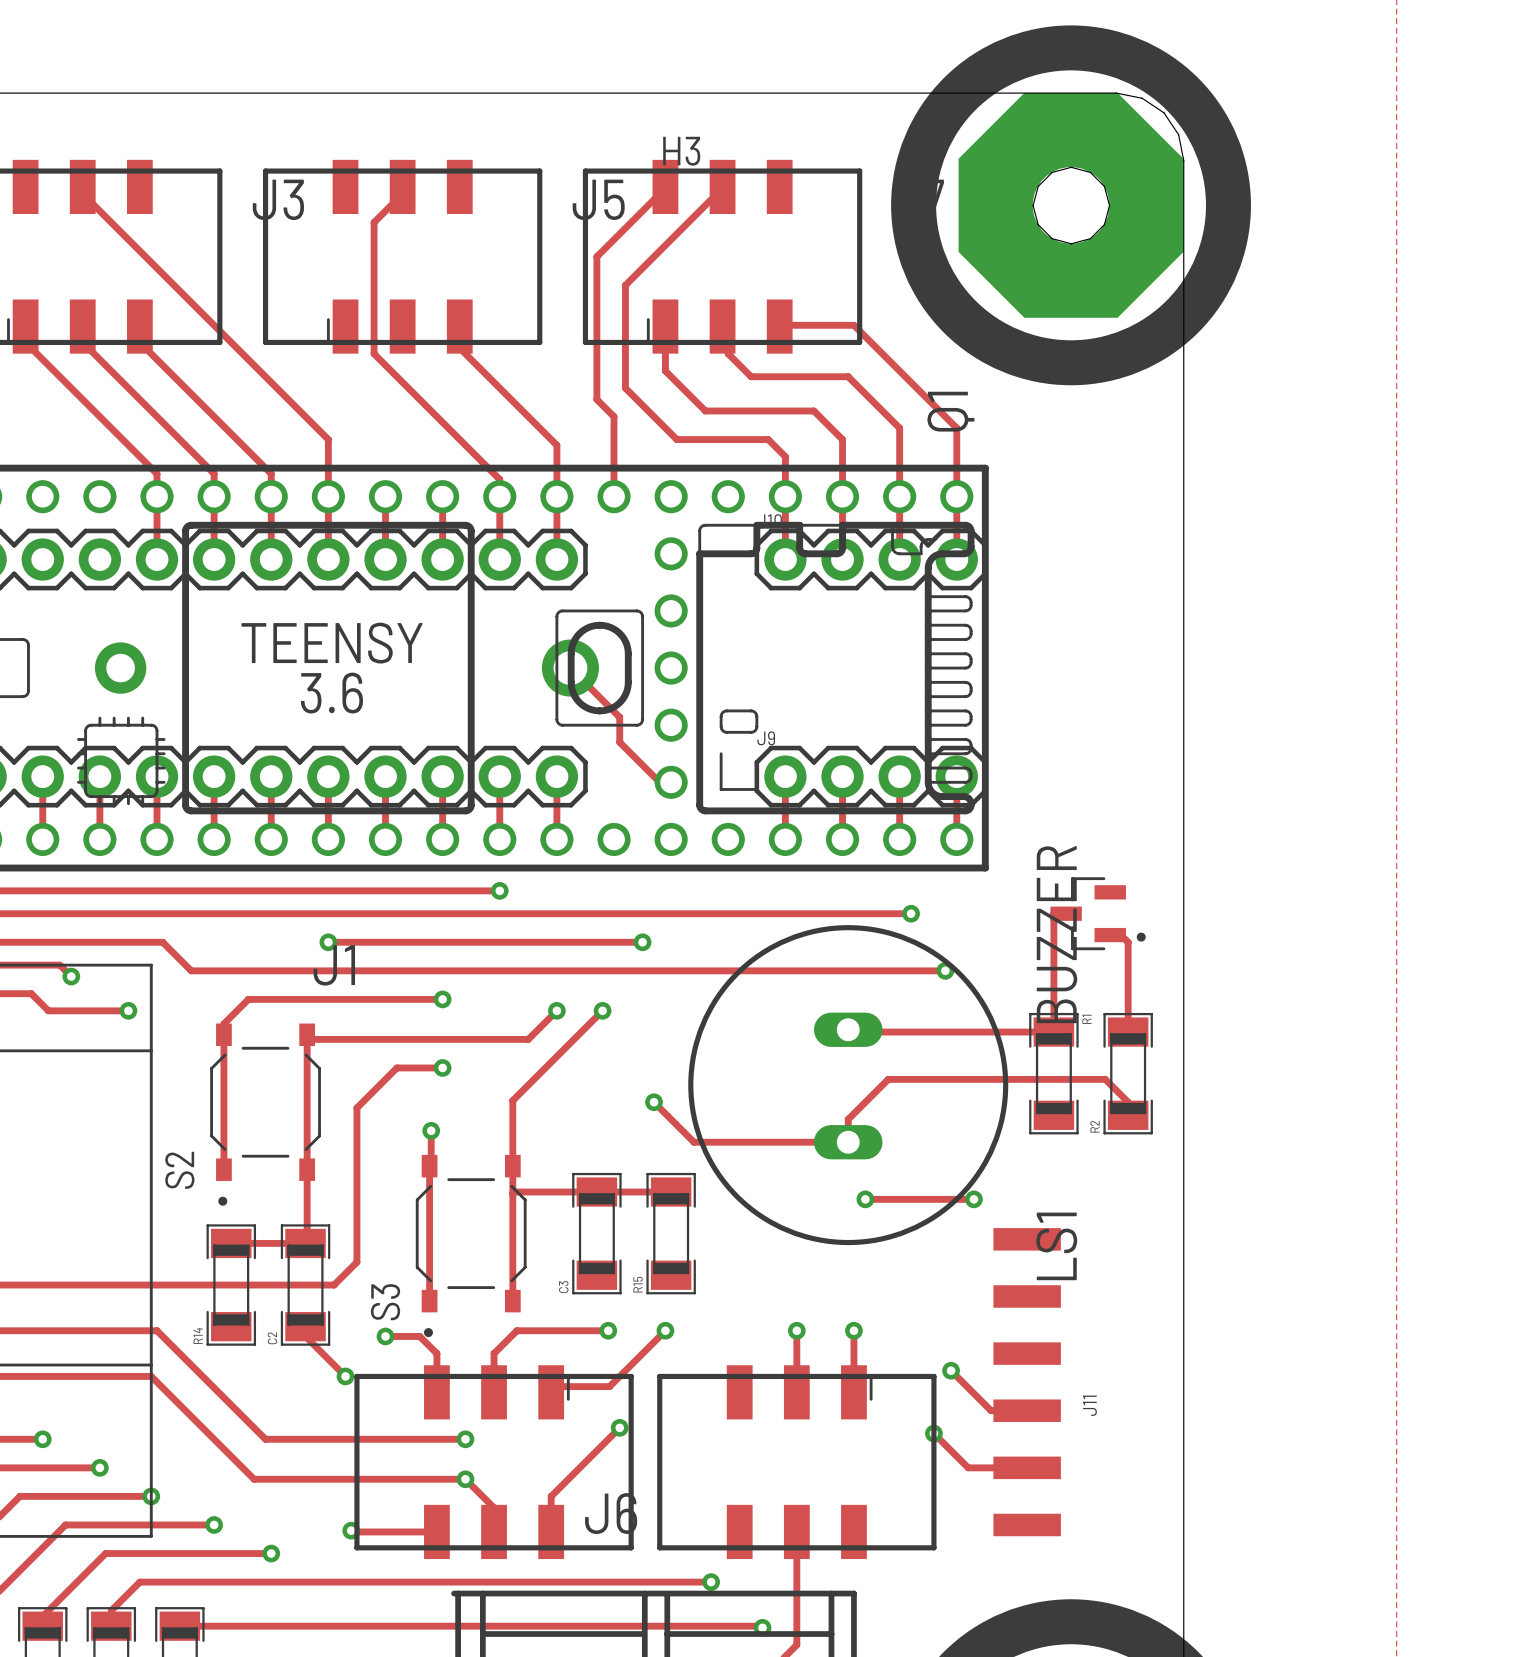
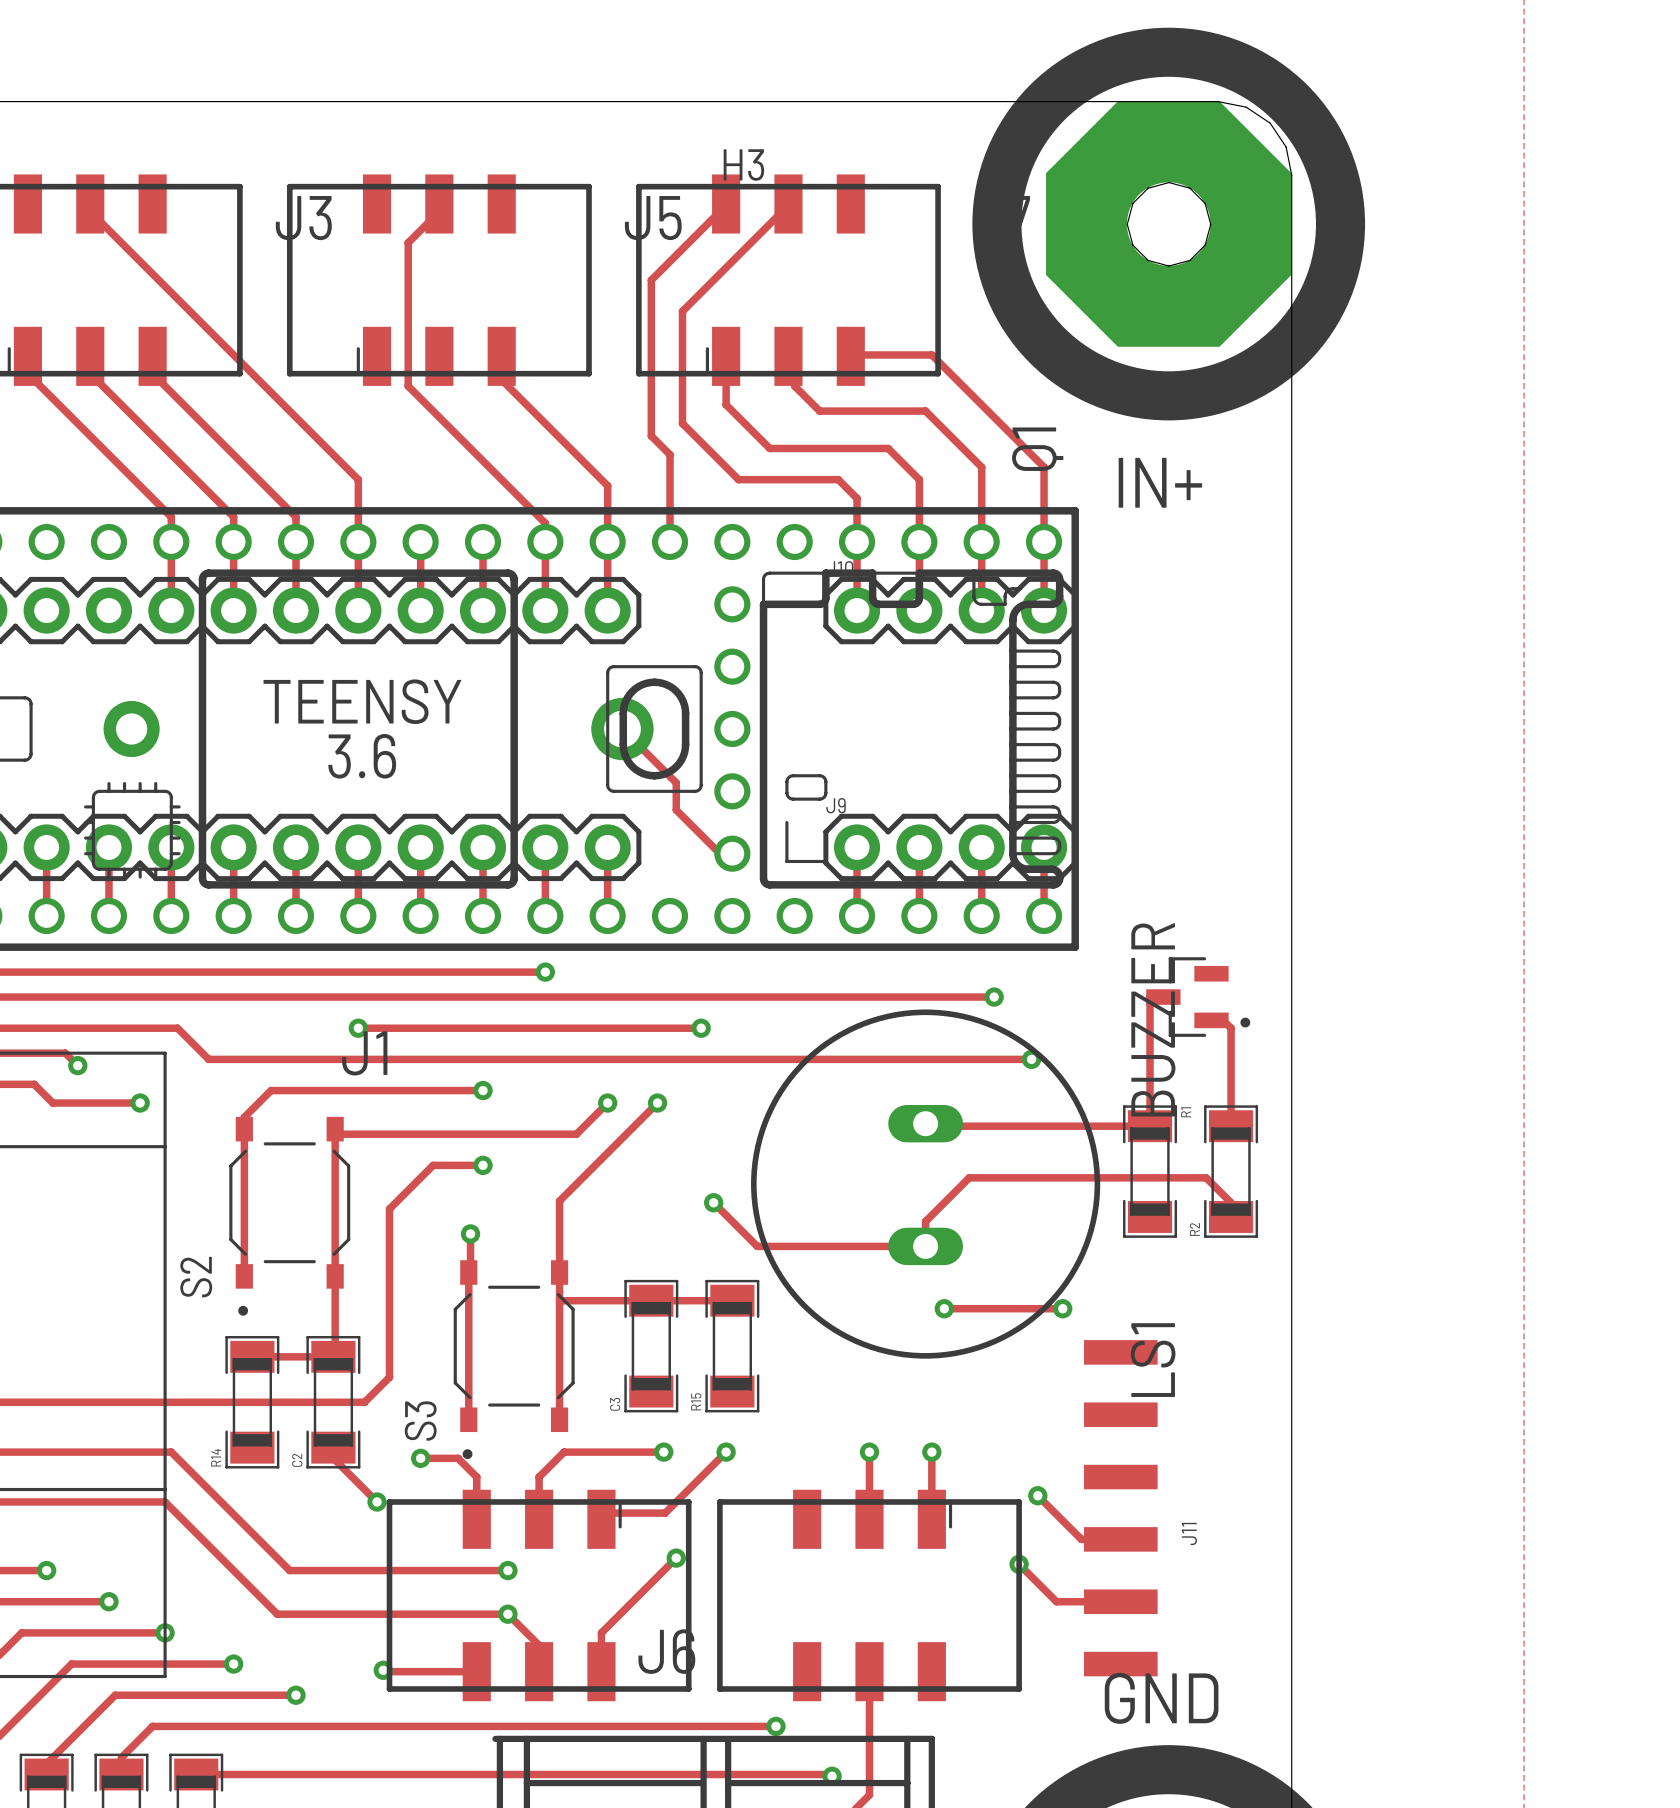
text: none -> IN+ (1160, 482)
text: none -> GND (1161, 1698)

